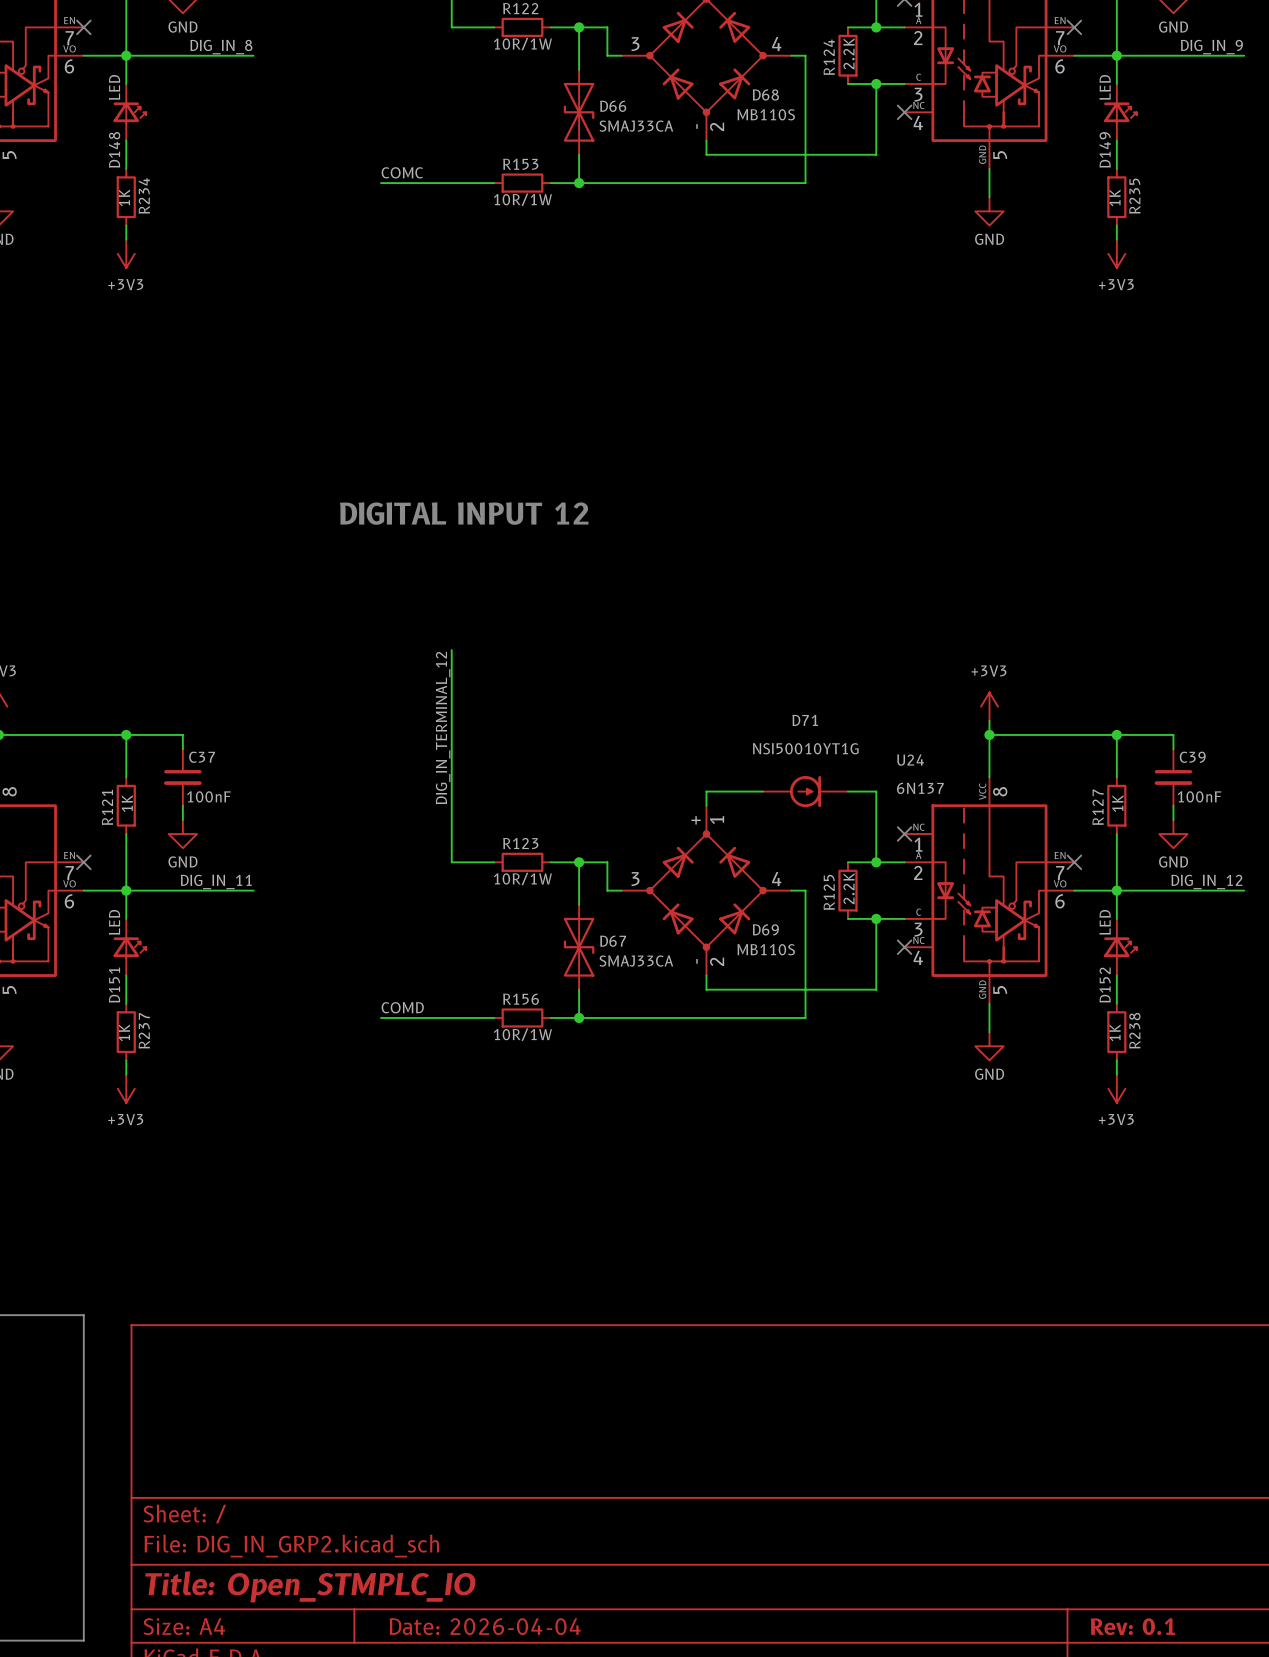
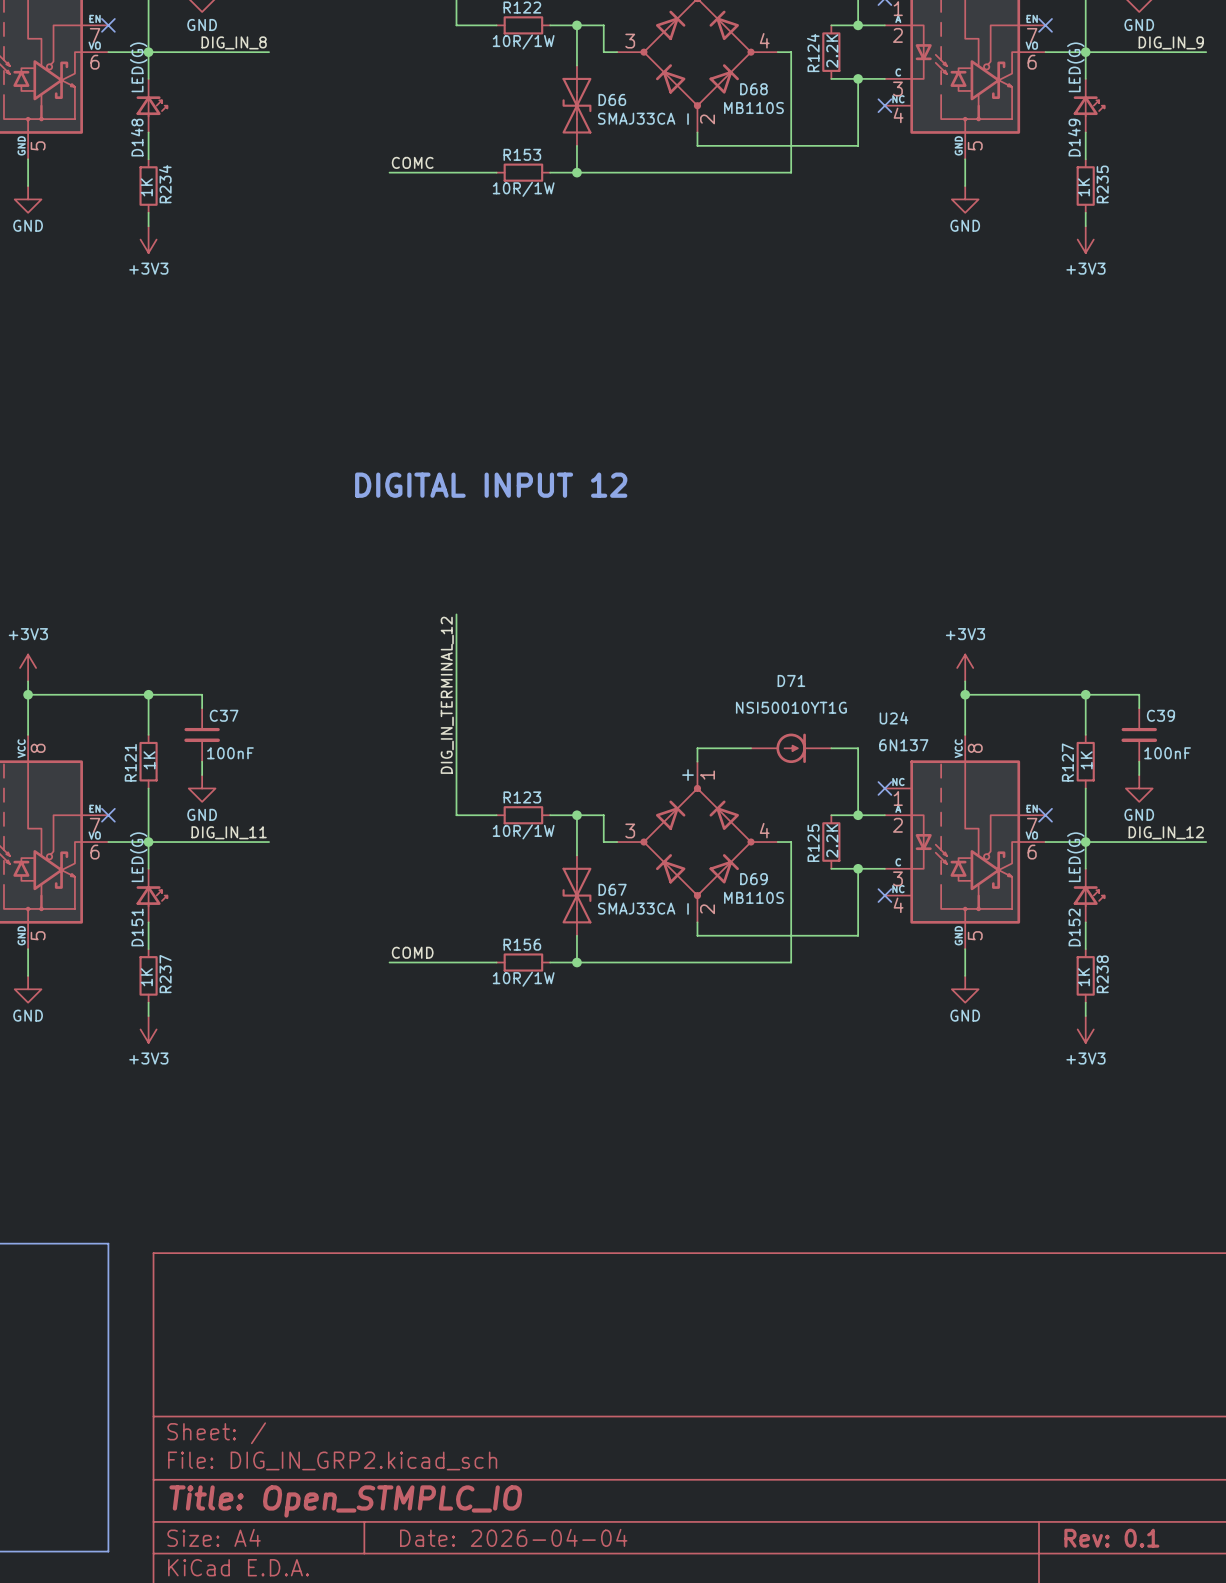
D148 value: LED (114, 87) -> LED(G) (138, 67)
D149 value: LED (1105, 87) -> LED(G) (1075, 67)
D151 value: LED (114, 922) -> LED(G) (138, 857)
D152 value: LED (1105, 922) -> LED(G) (1075, 857)

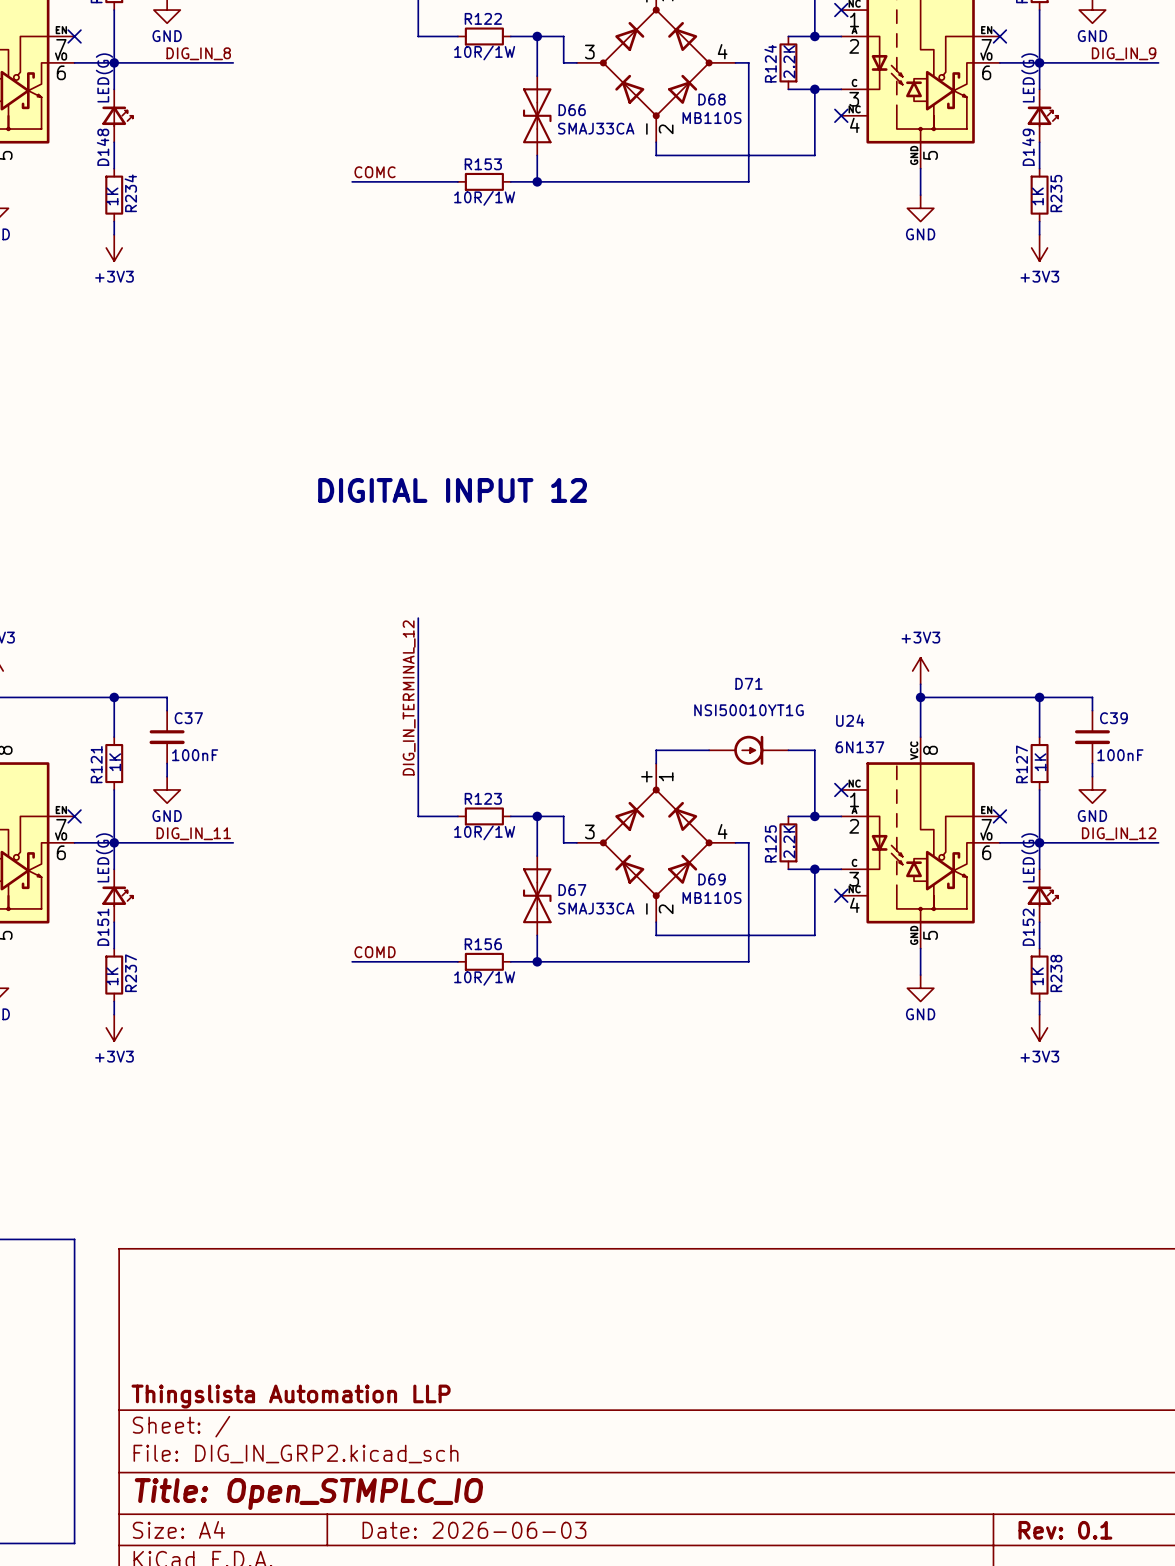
title block: none -> Thingslista Automation LLP (291, 1396)
title block: Date: 2026-04-04 (513, 1537) -> Date: 2026-06-03 (474, 1530)

